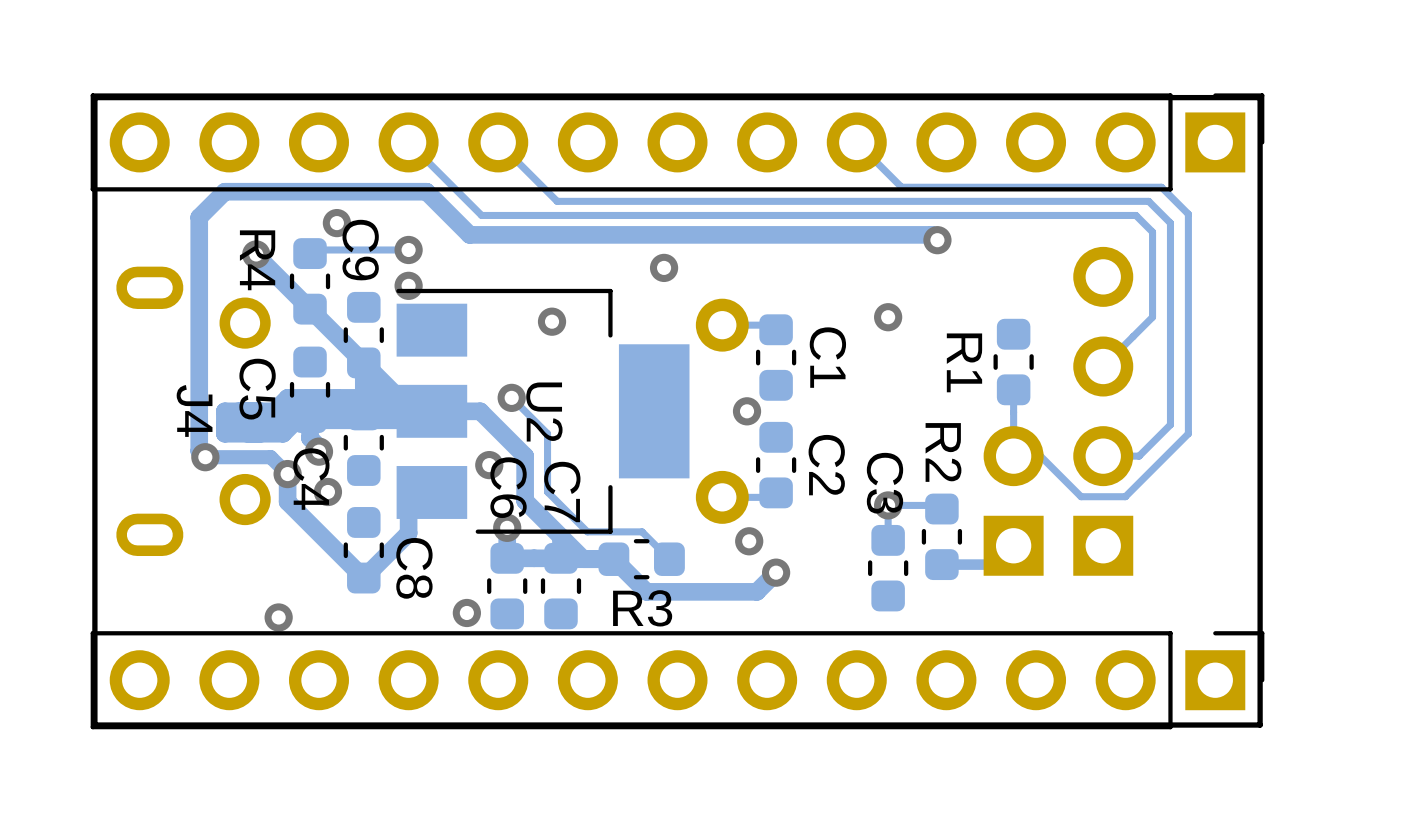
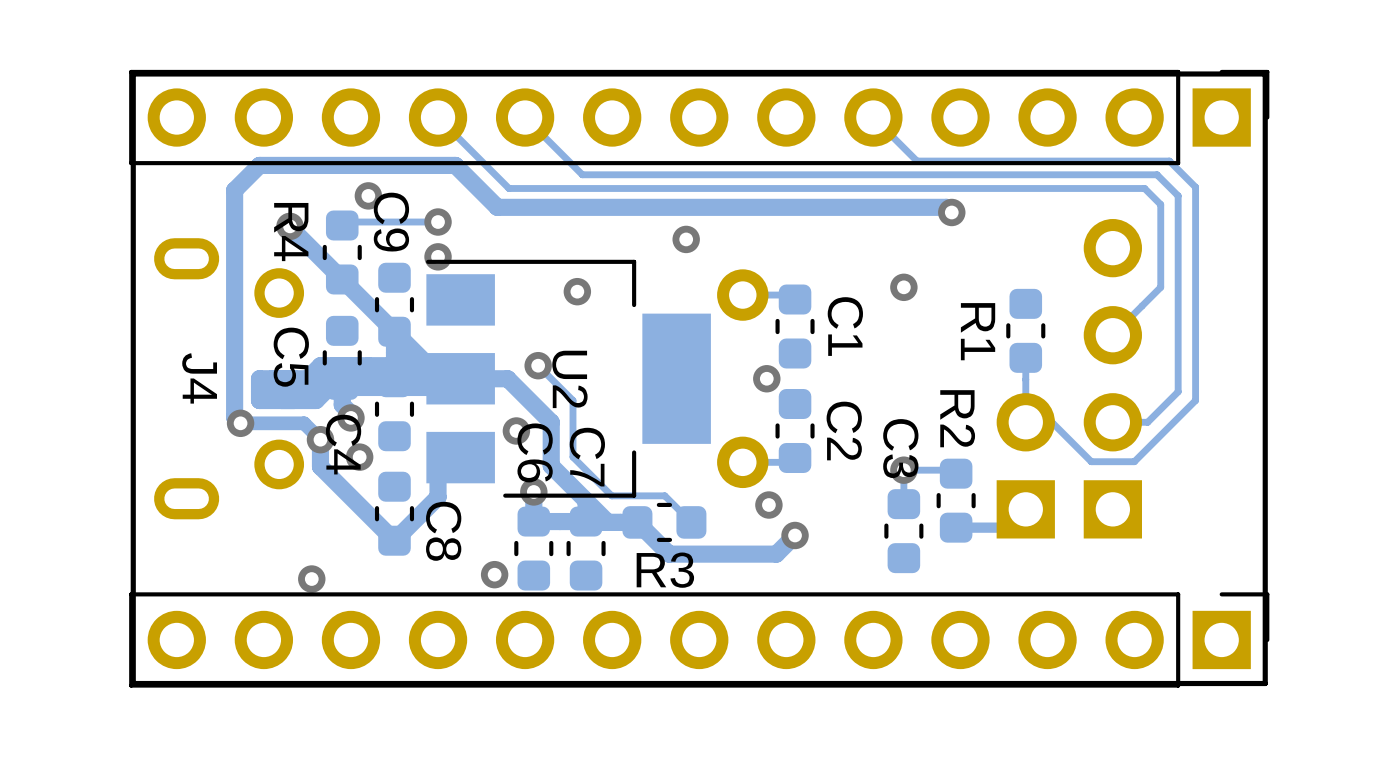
J4 name position: J4 (194, 410) -> J4 (199, 378)

